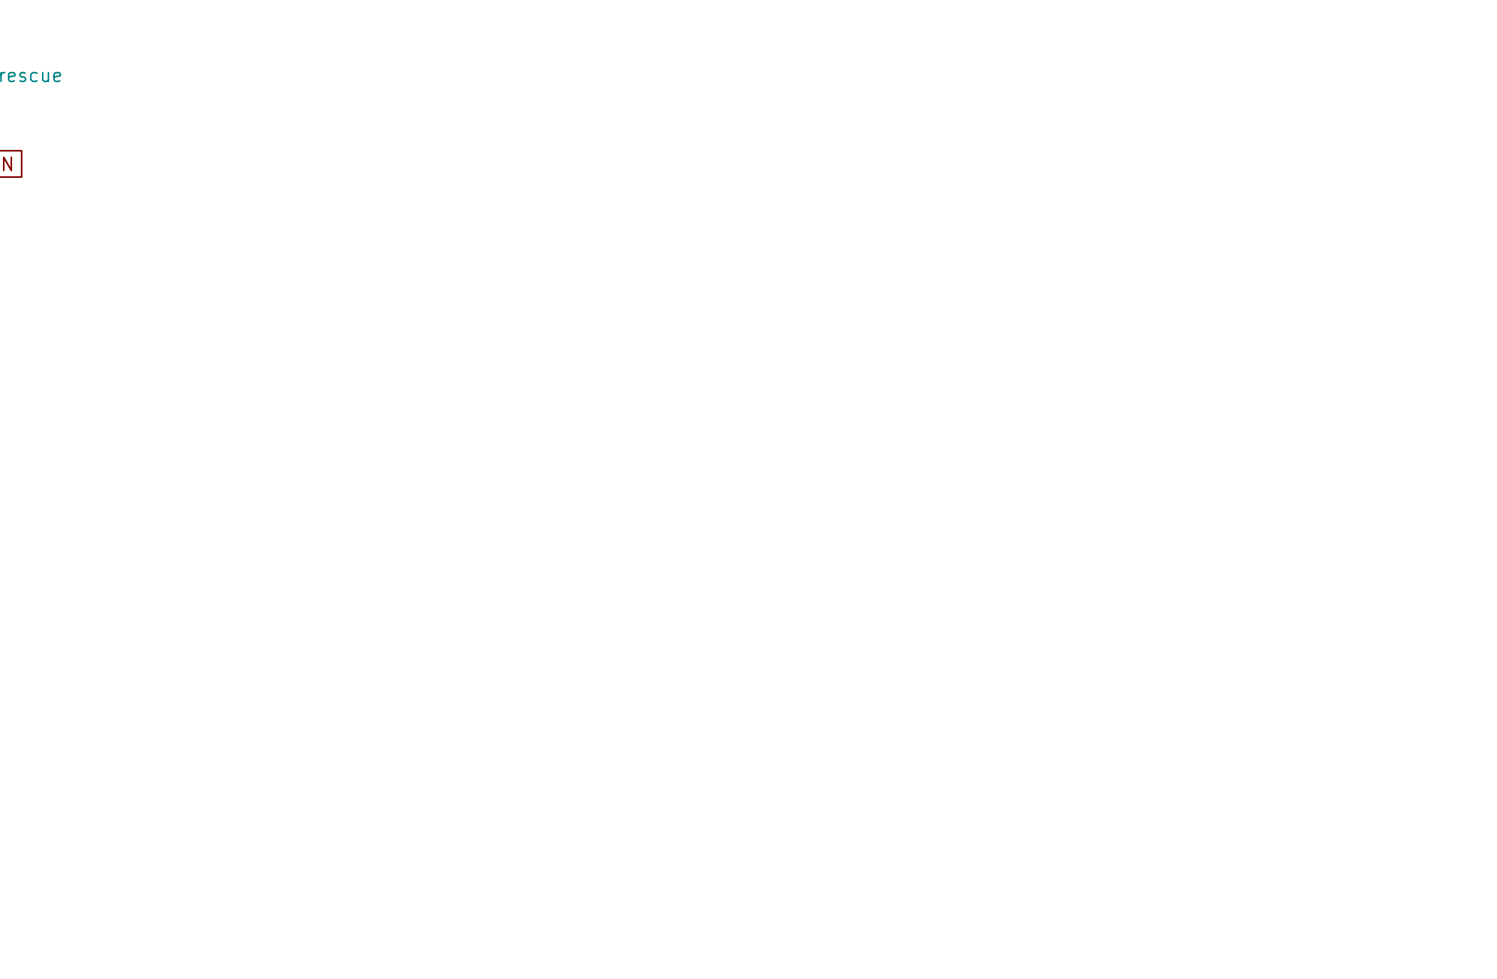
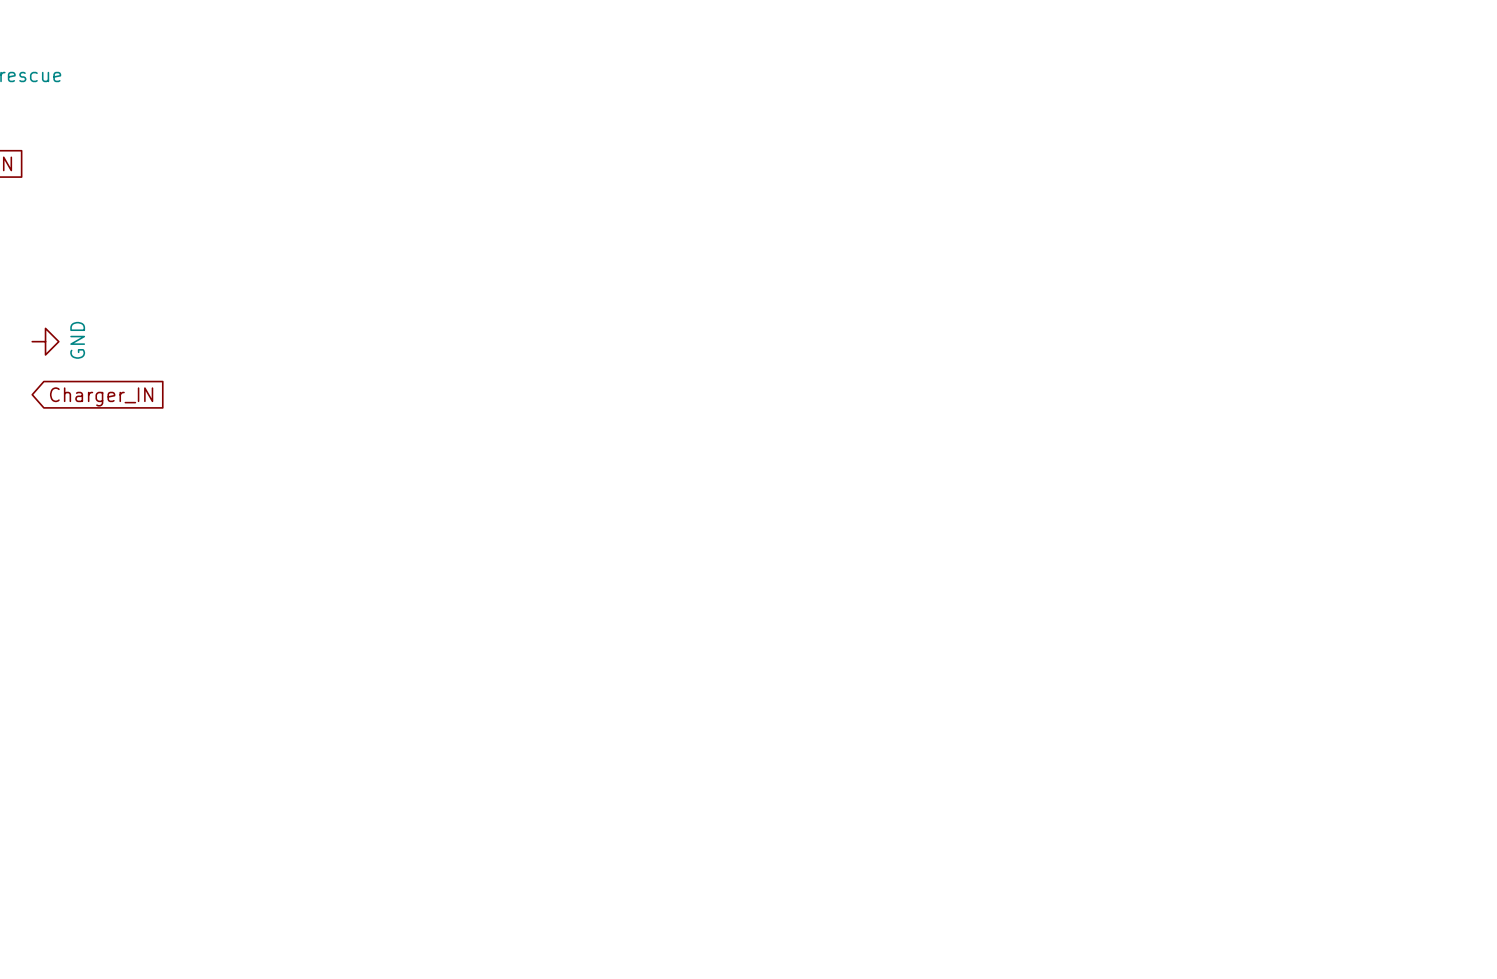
power symbol: none -> GND (45, 341)
global label: none -> Charger_IN (101, 396)

